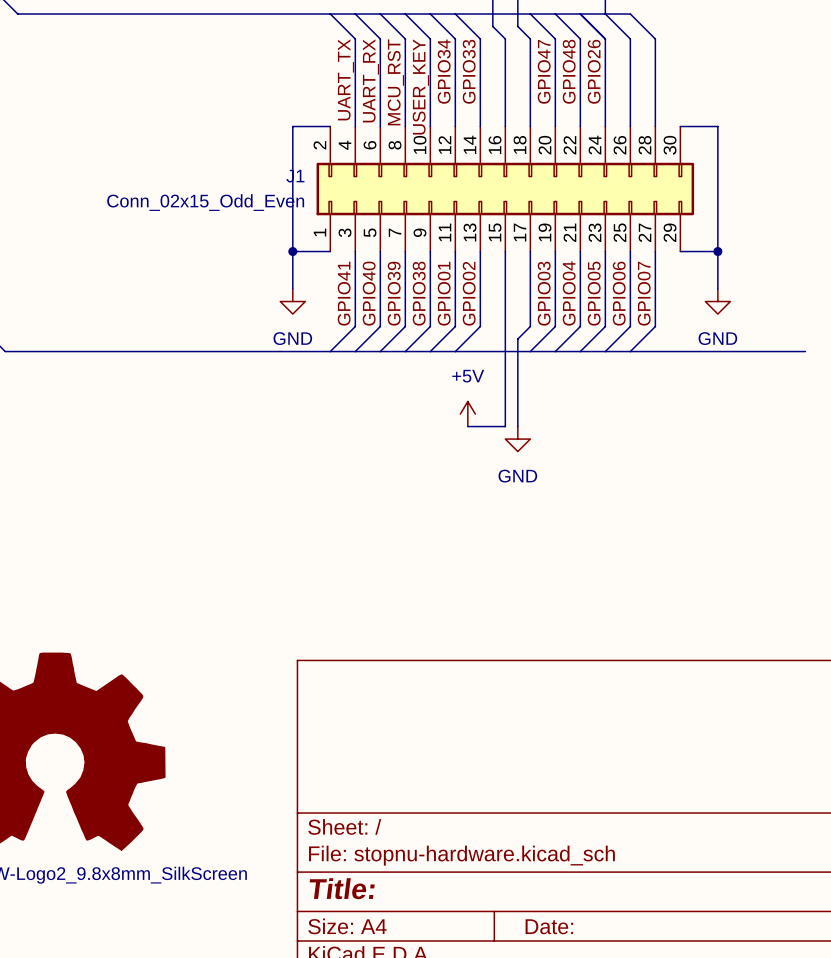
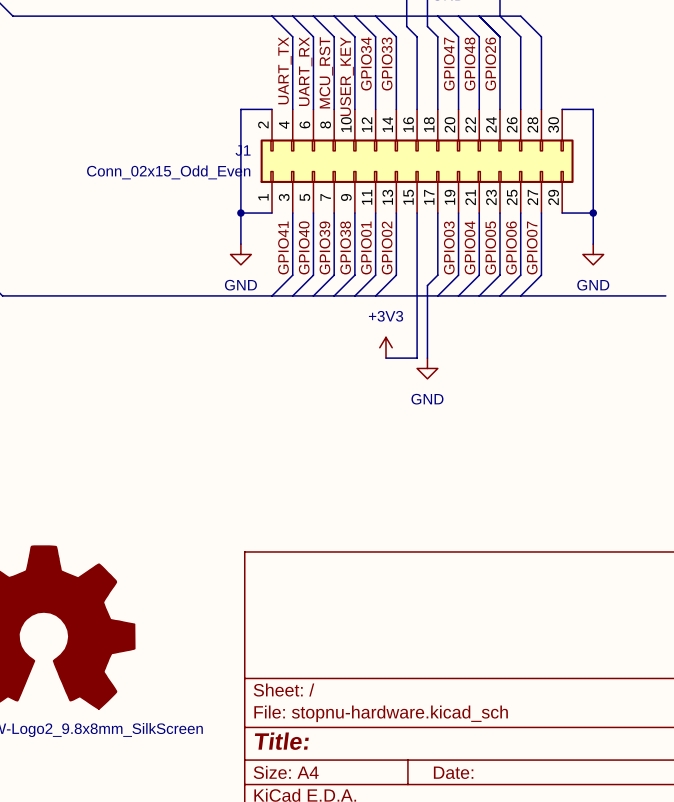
power symbol: +5V (467, 414) -> +3V3 (385, 347)

